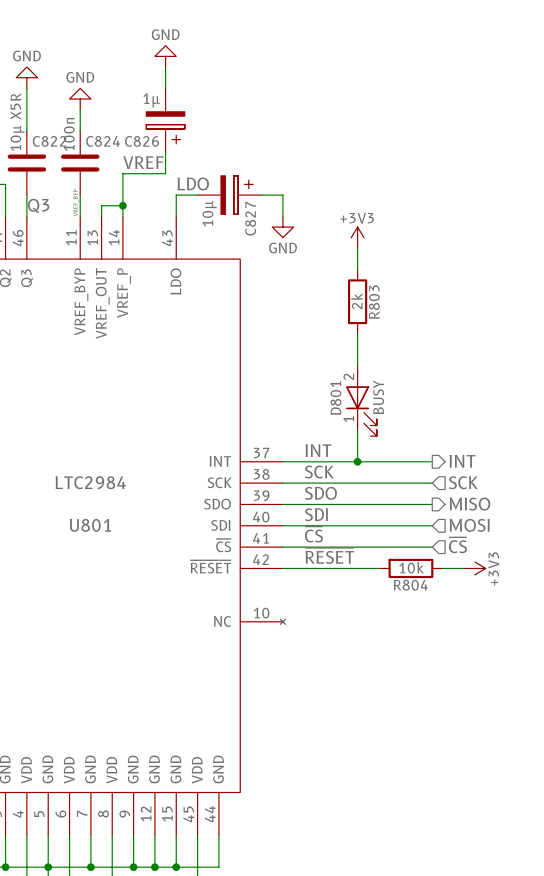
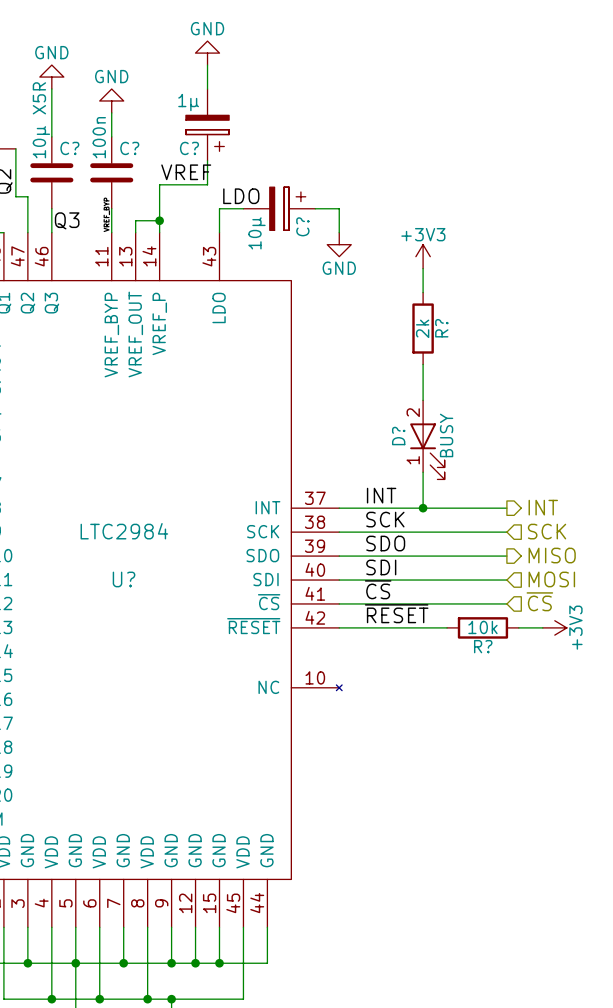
C822 name: C822 (49, 141) -> C? (69, 148)
C824 name: C824 (103, 141) -> C? (129, 148)
C826 name: C826 (142, 141) -> C? (189, 148)
C827 name: C827 (250, 218) -> C? (302, 226)
R803 name: R803 (374, 302) -> R? (441, 328)
D801 name: D801 (335, 398) -> D? (398, 436)
U801 name: U801 (90, 525) -> U? (124, 579)
R804 name: R804 (410, 585) -> R? (483, 646)

